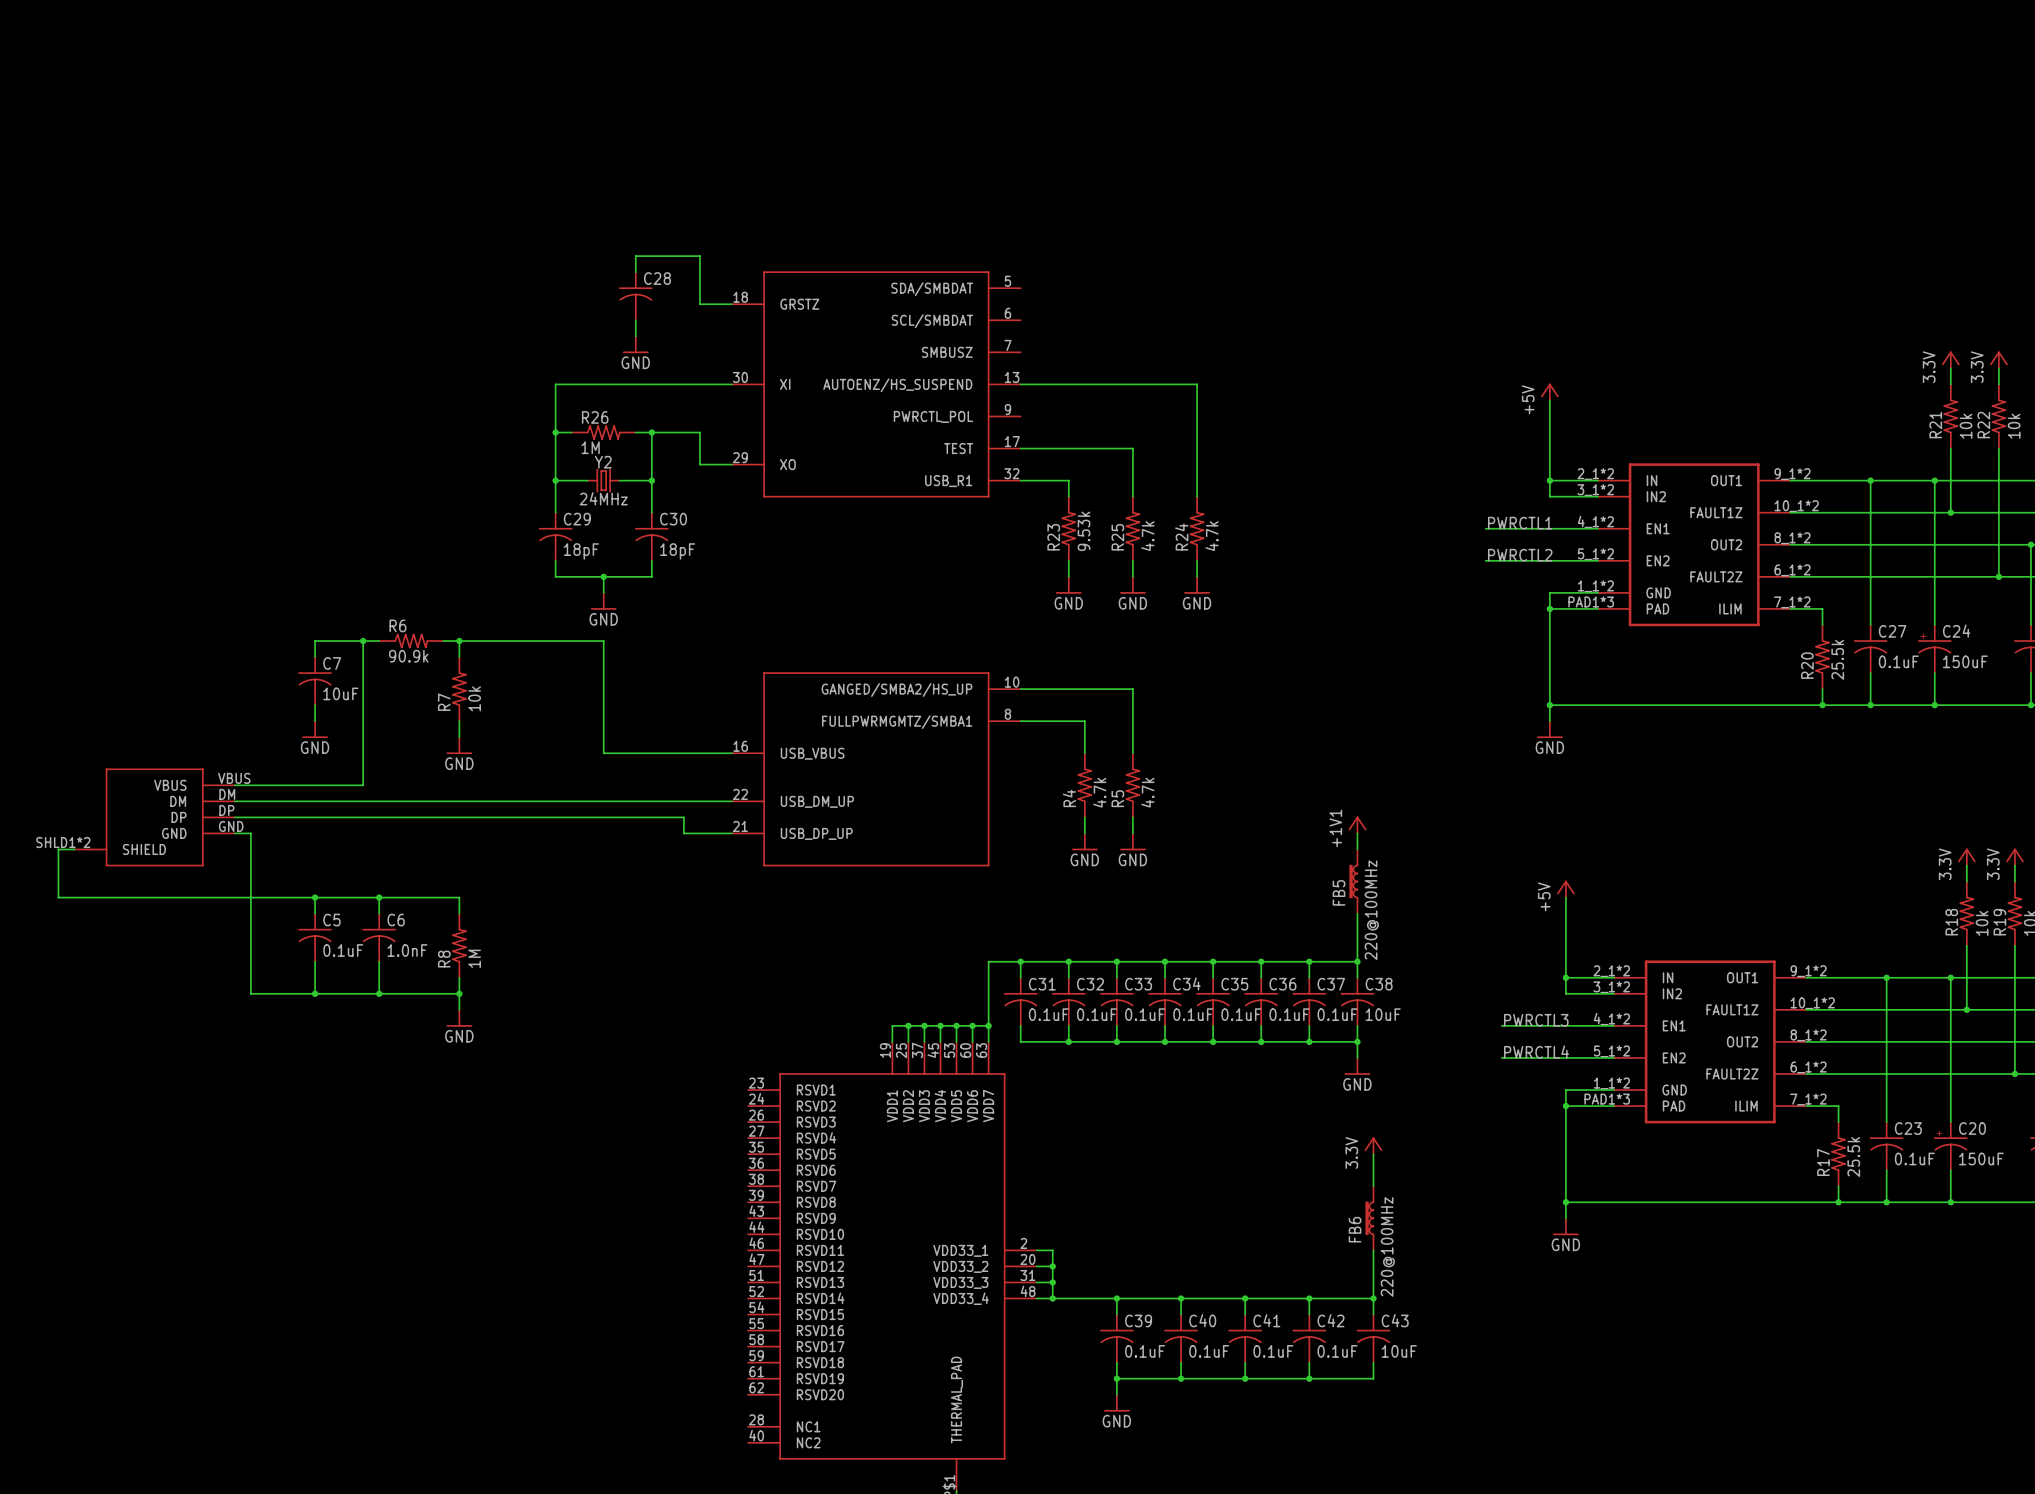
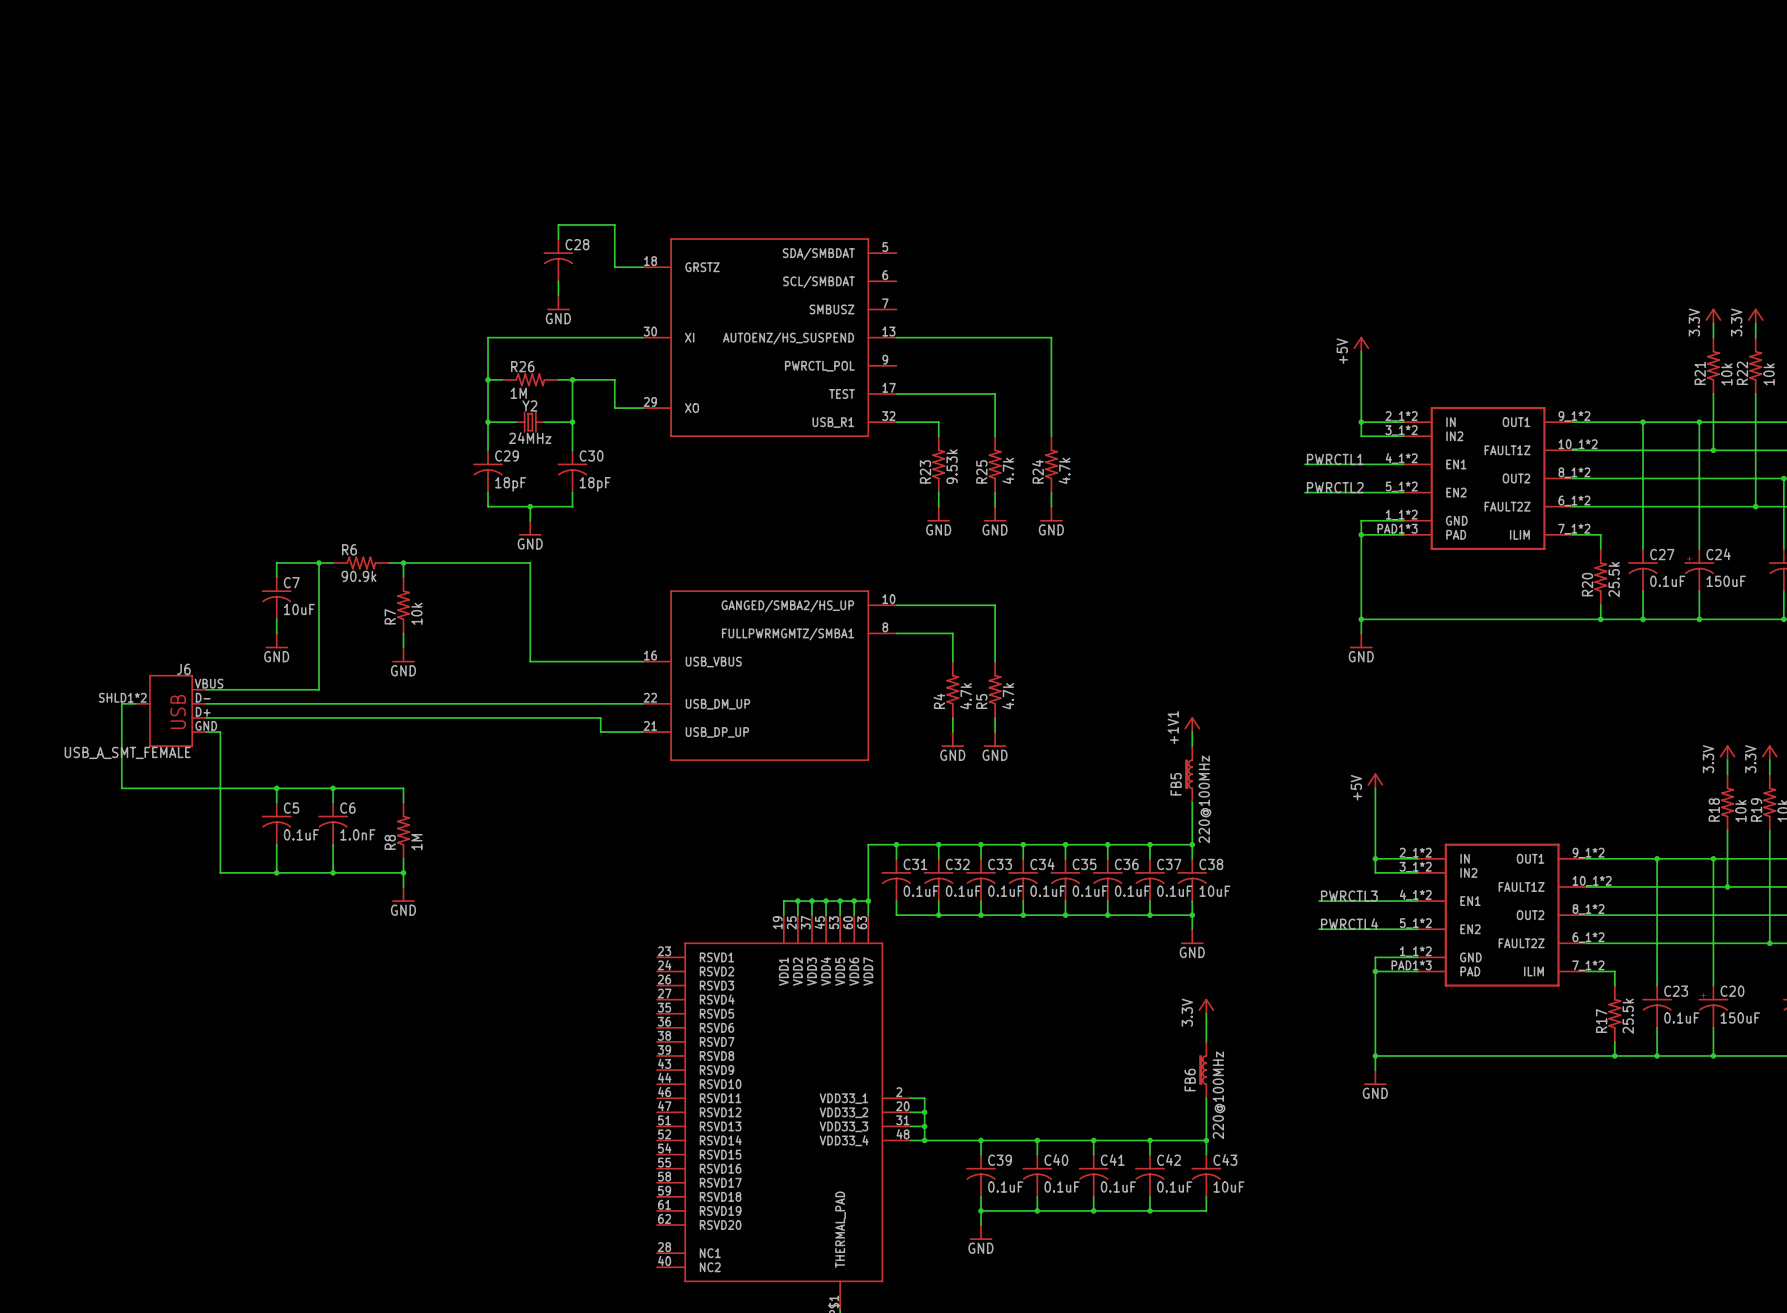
J6: none -> USB_A_SMT_FEMALE (171, 710)
part: (154, 817) -> none
wire: (74, 849) (58, 849) (58, 897) (138, 897) -> (135, 703) (121, 703) (121, 788)

